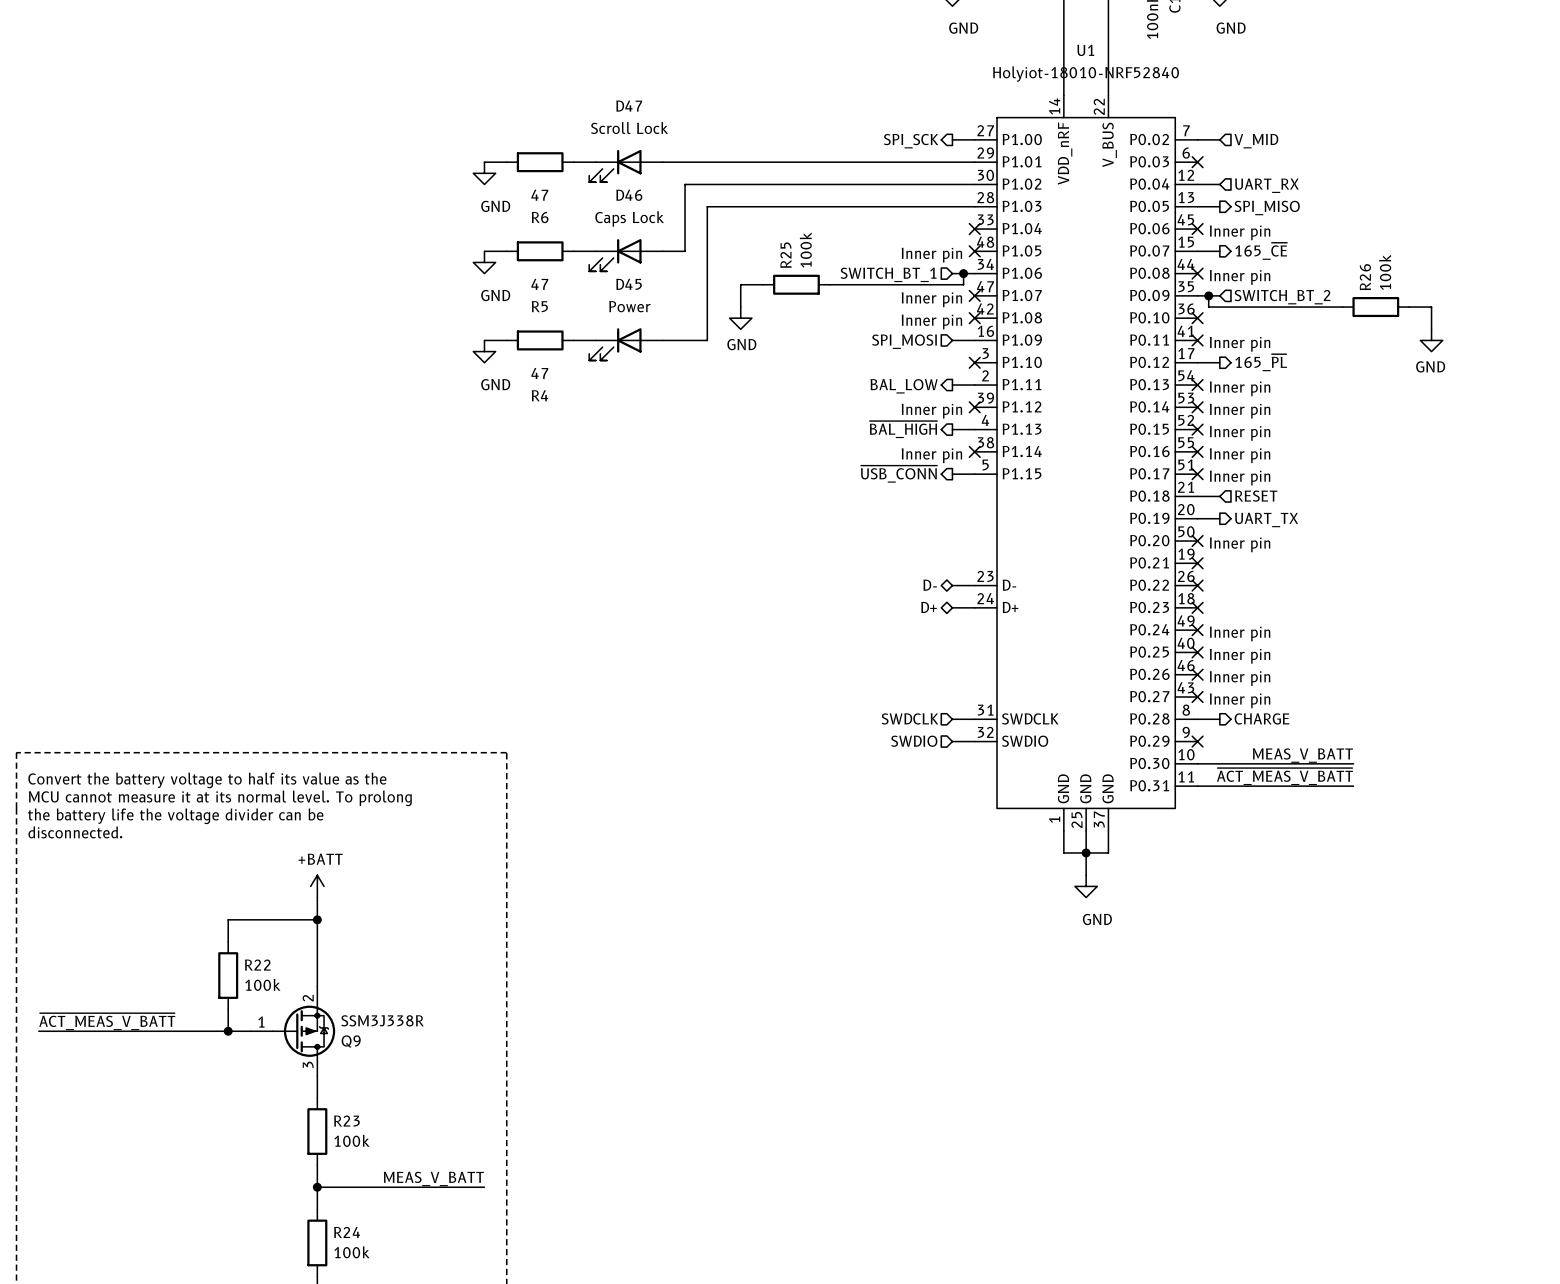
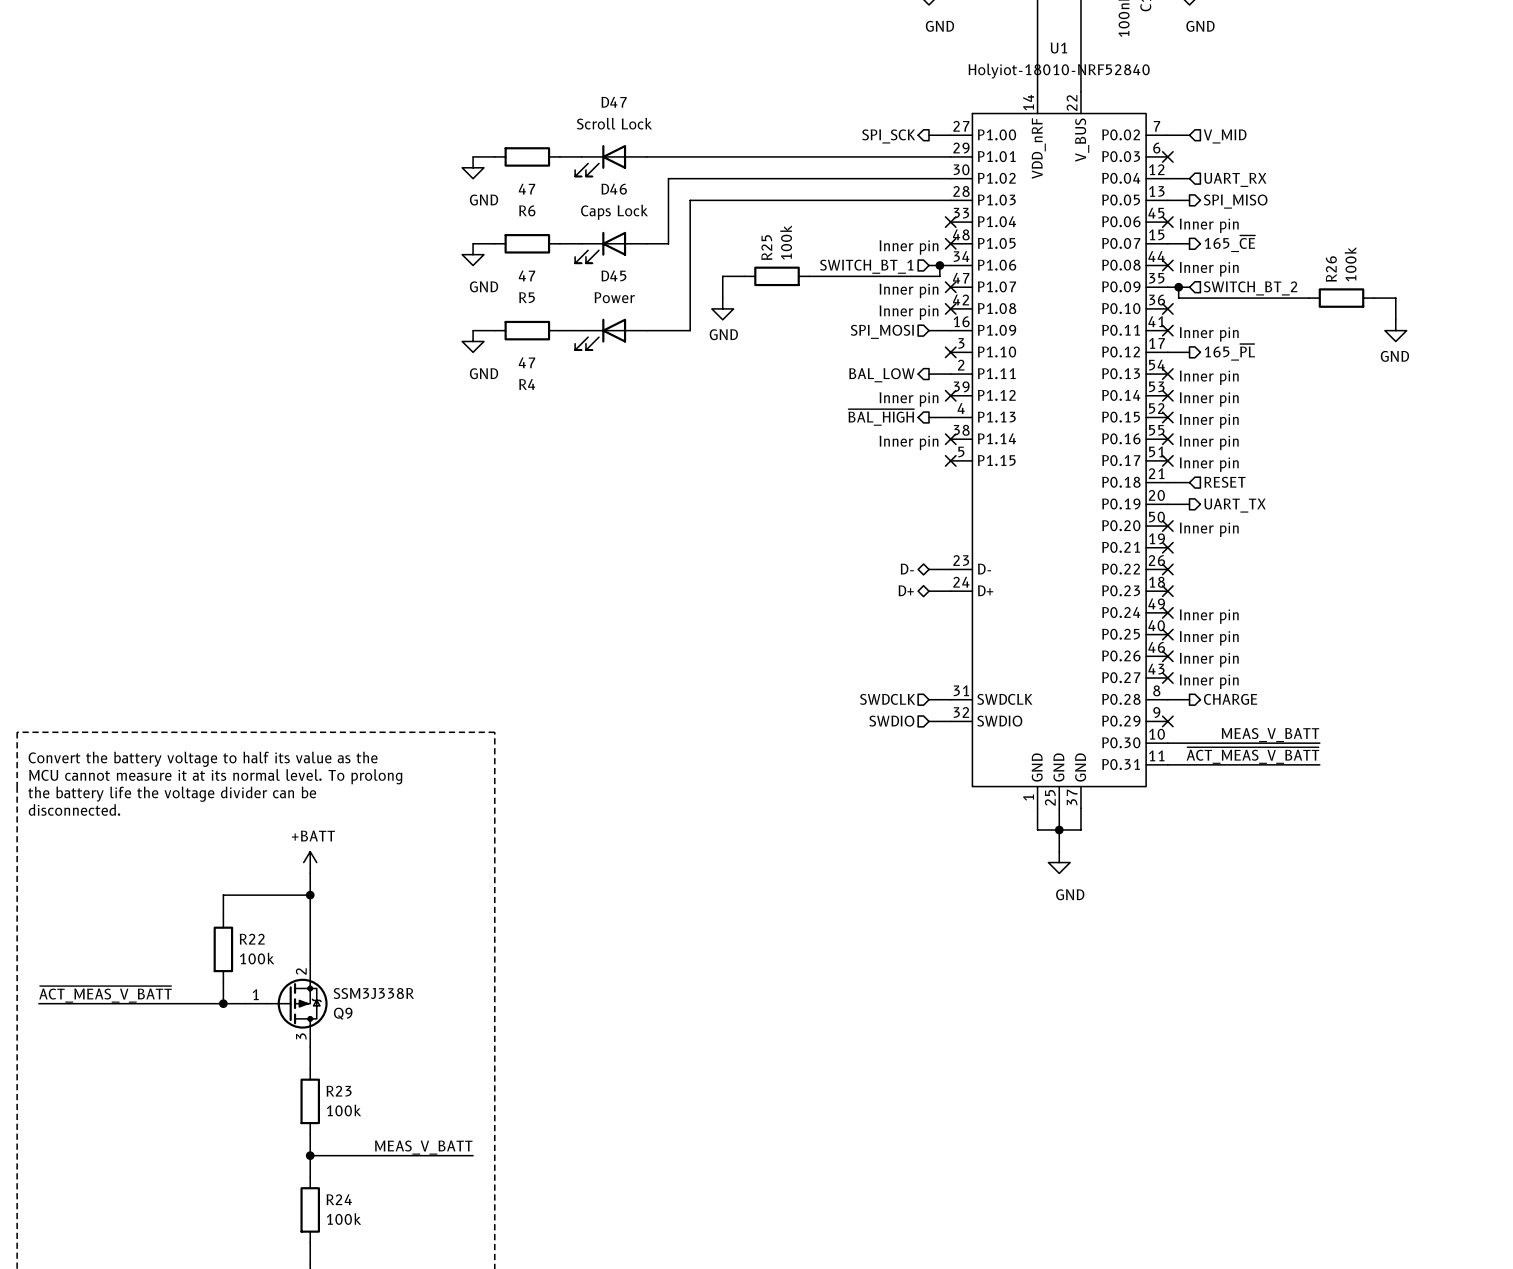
hierarchical label: ~{USB_CONN} (899, 474) -> none
wire: (952, 474) (974, 474) -> none
no-connect mark: none -> (950, 460)

